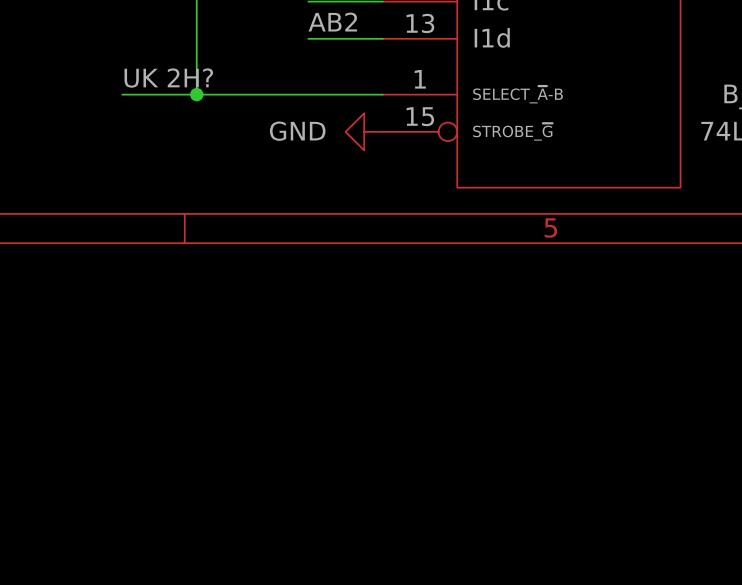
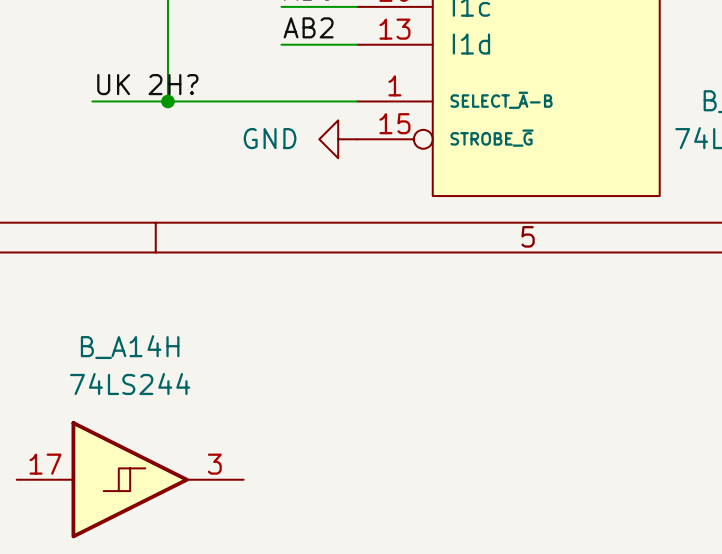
B_A14H: none -> 74LS244 (130, 479)

